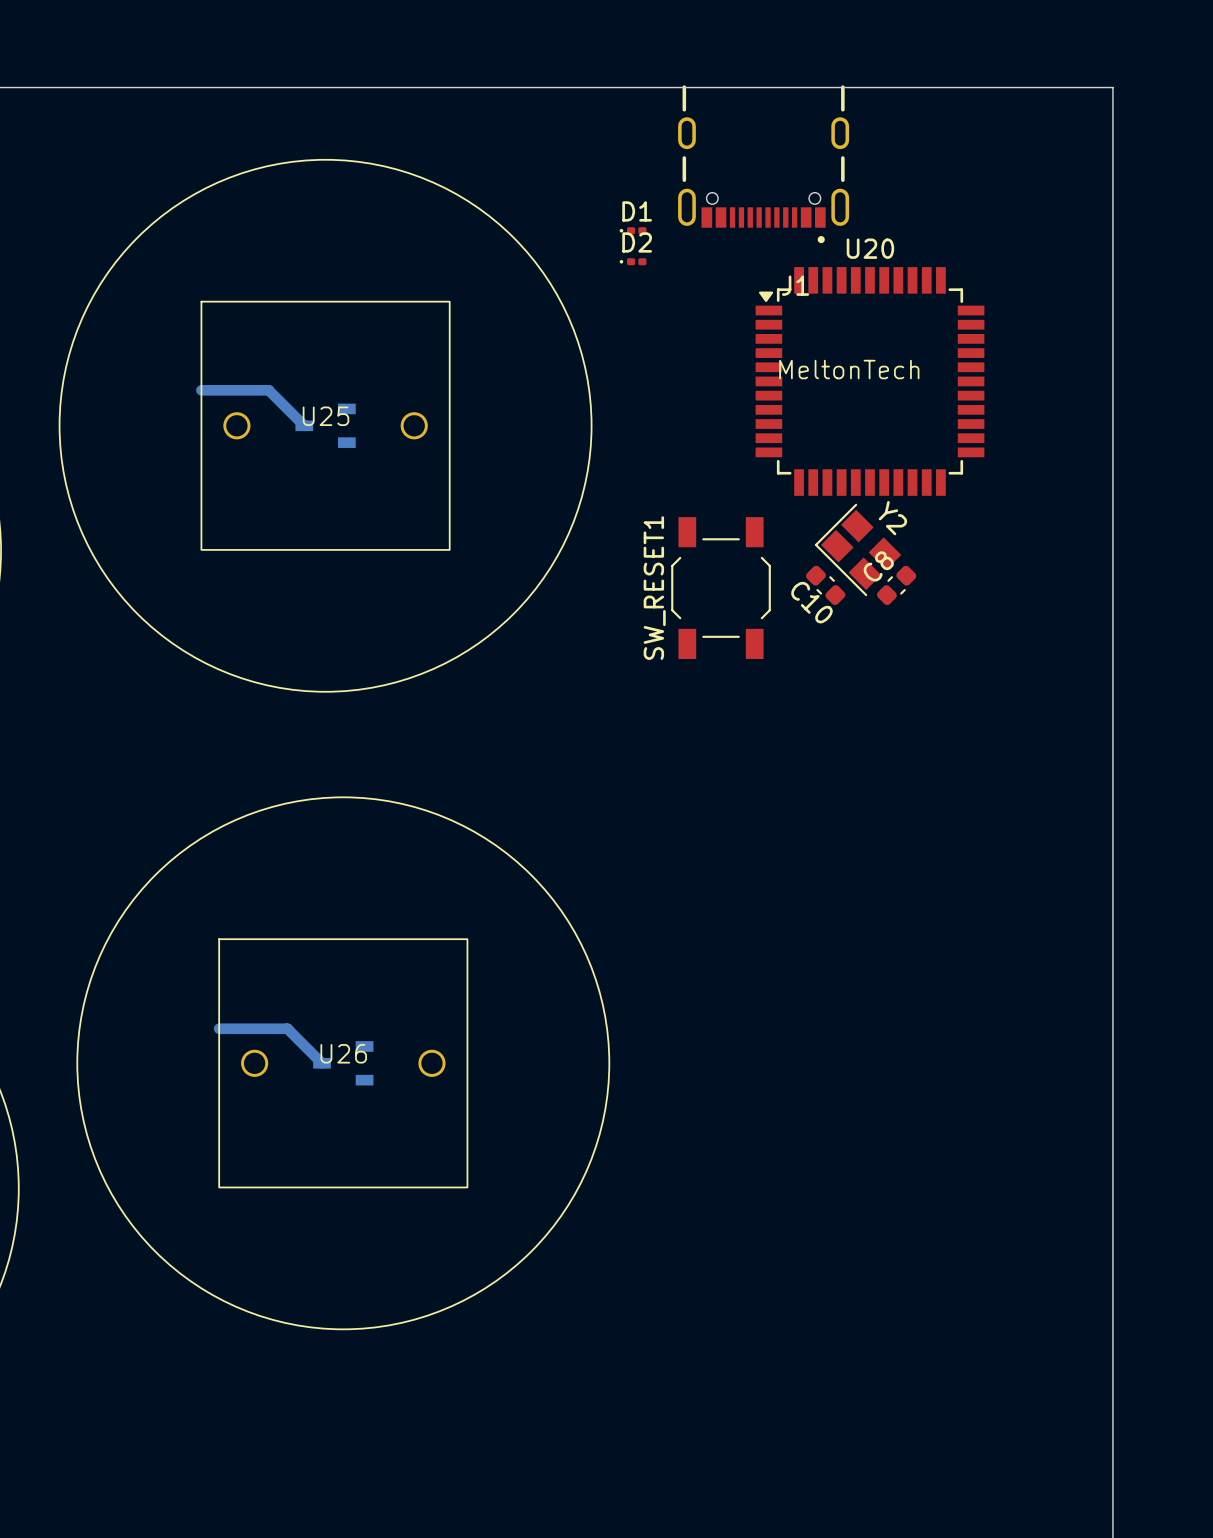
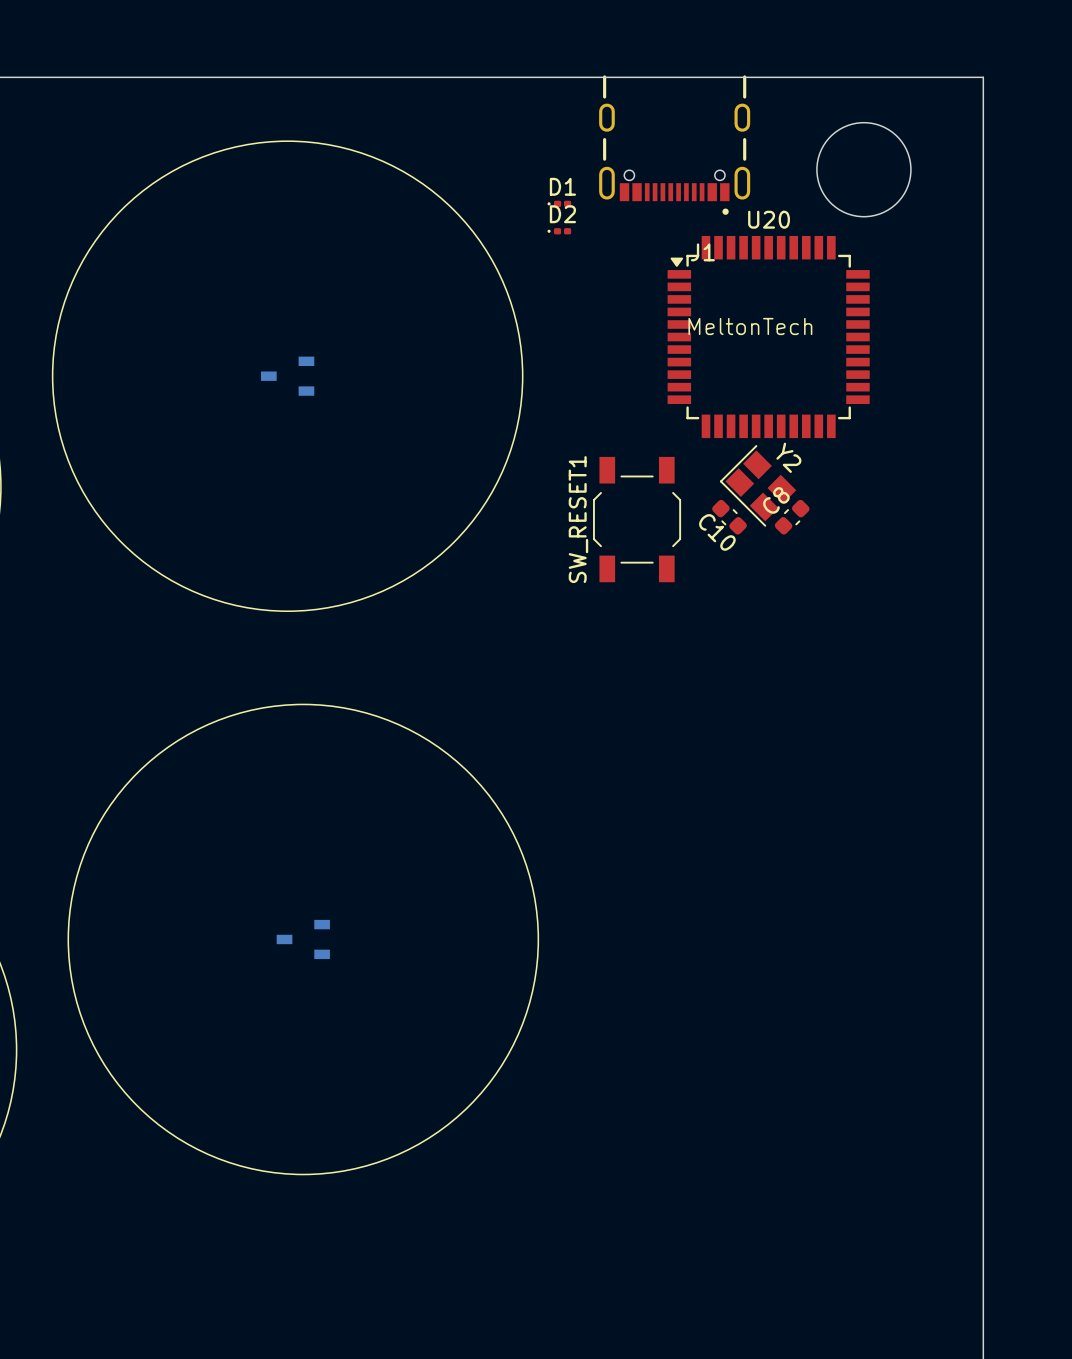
round board edge: none -> [816, 122, 912, 218]
bottom track: (201, 390) (268, 390) (304, 425) -> none
U25: (325, 425) -> none
bottom track: (219, 1028) (287, 1028) (322, 1063) -> none
U26: (343, 1063) -> none

